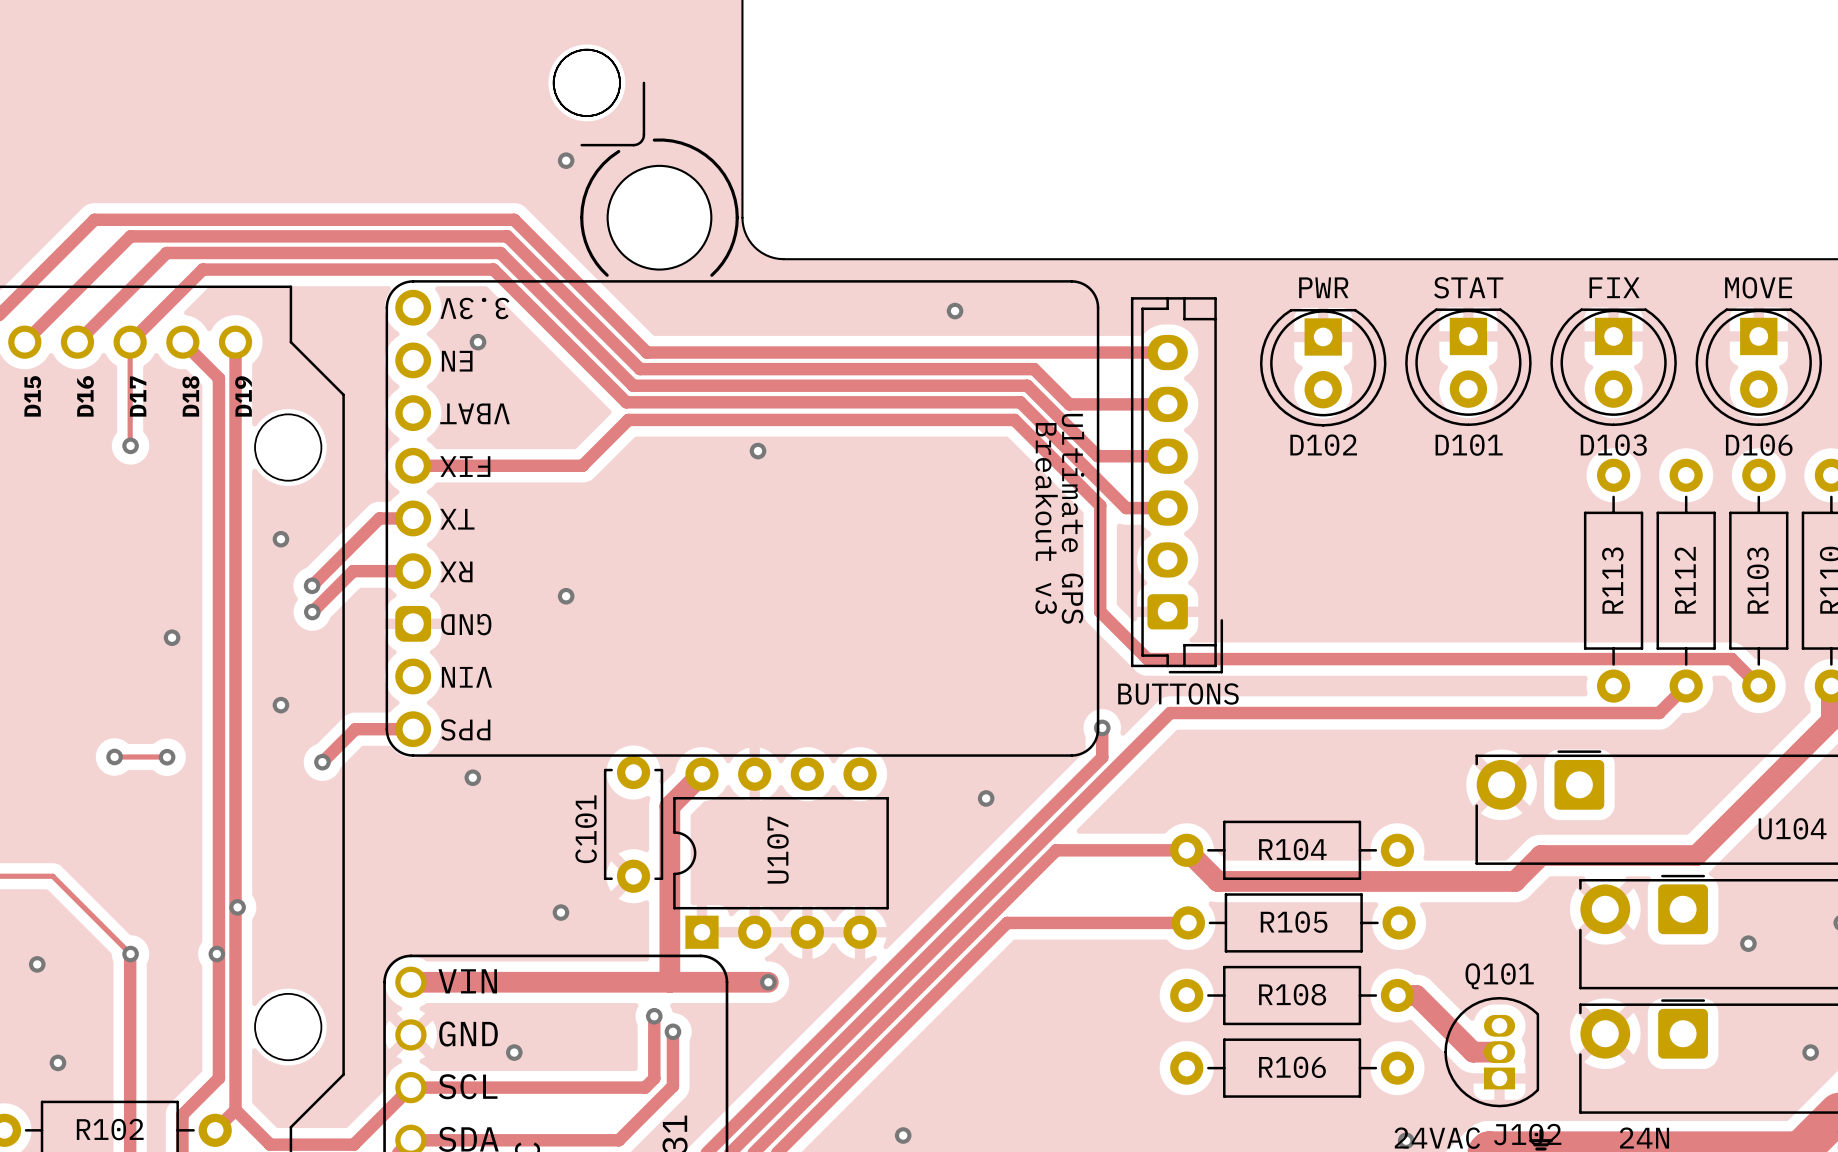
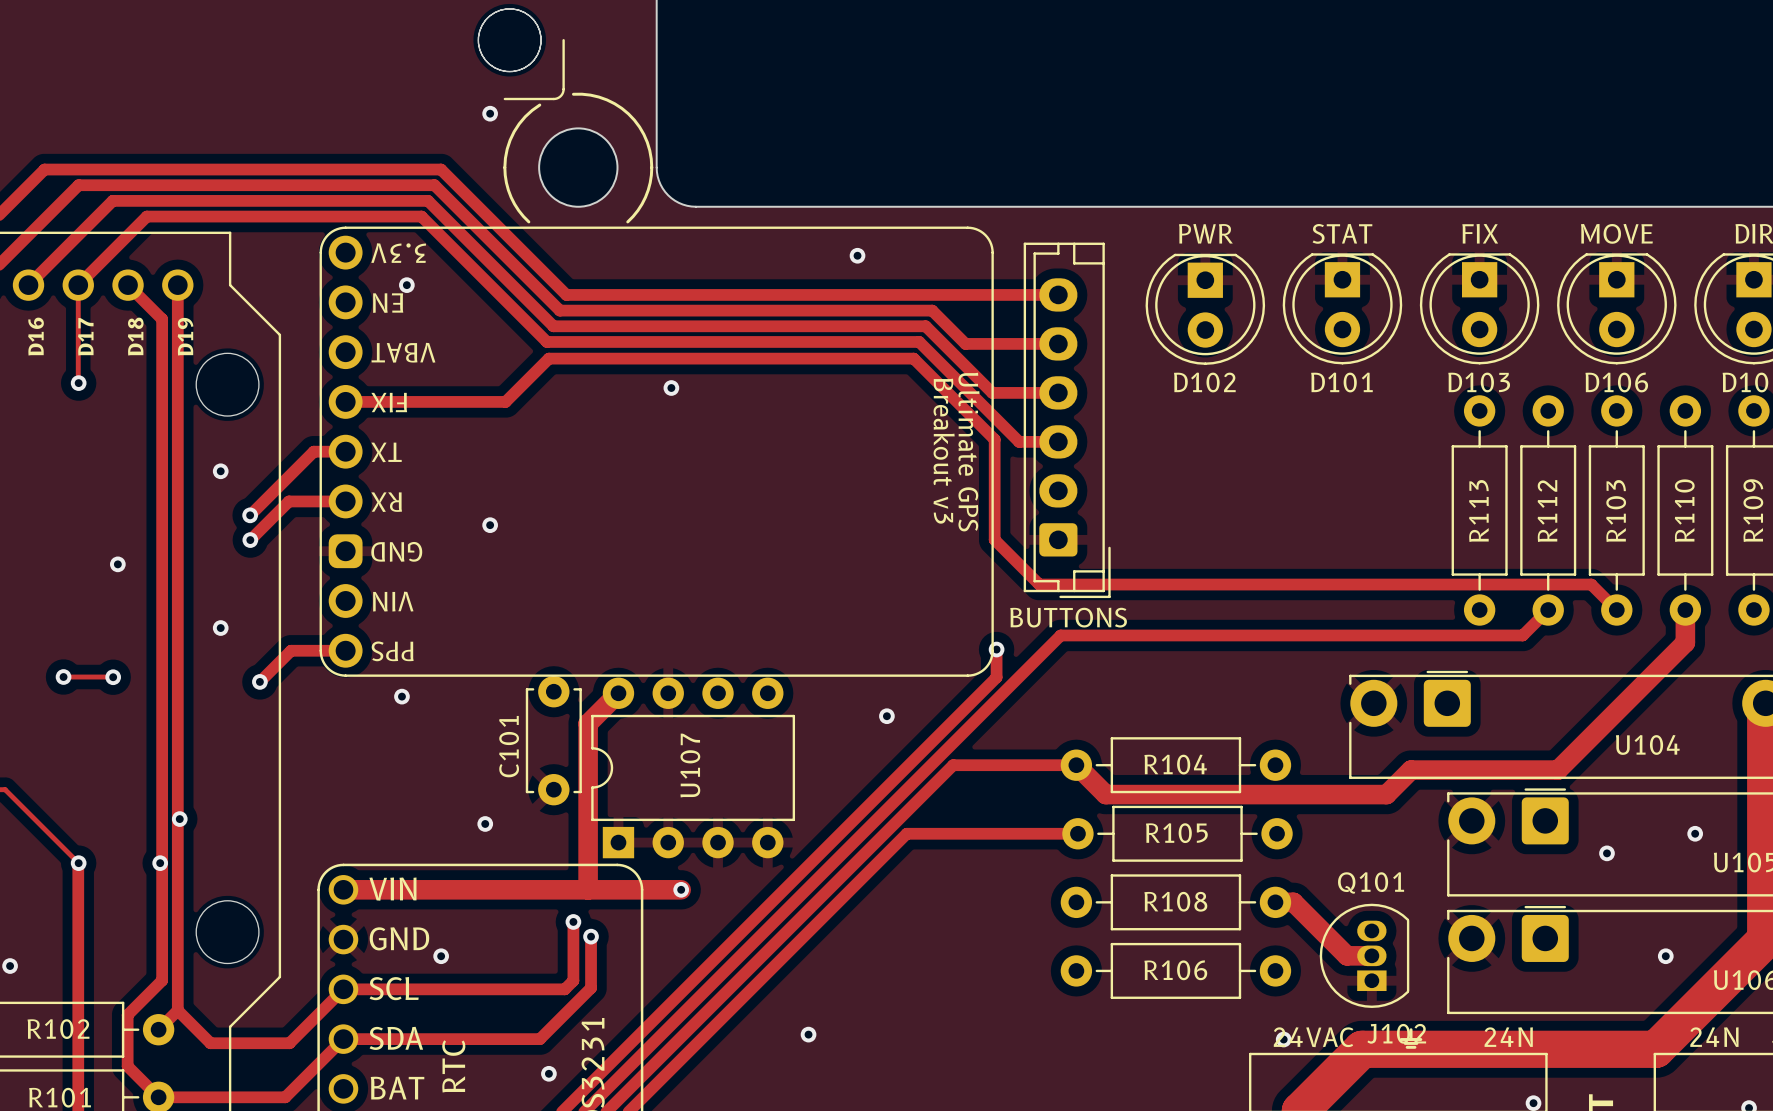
round board edge size: [606, 164, 713, 271] -> [538, 127, 619, 208]

